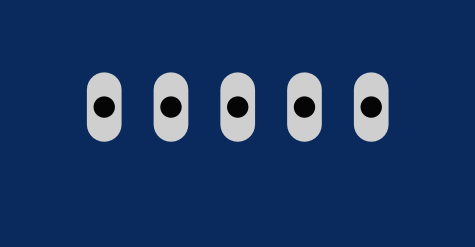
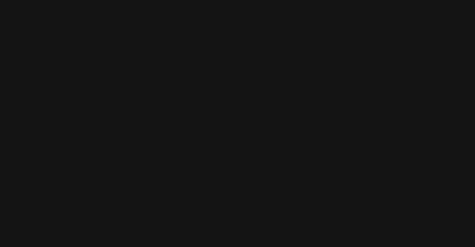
part: (237, 107) -> none

